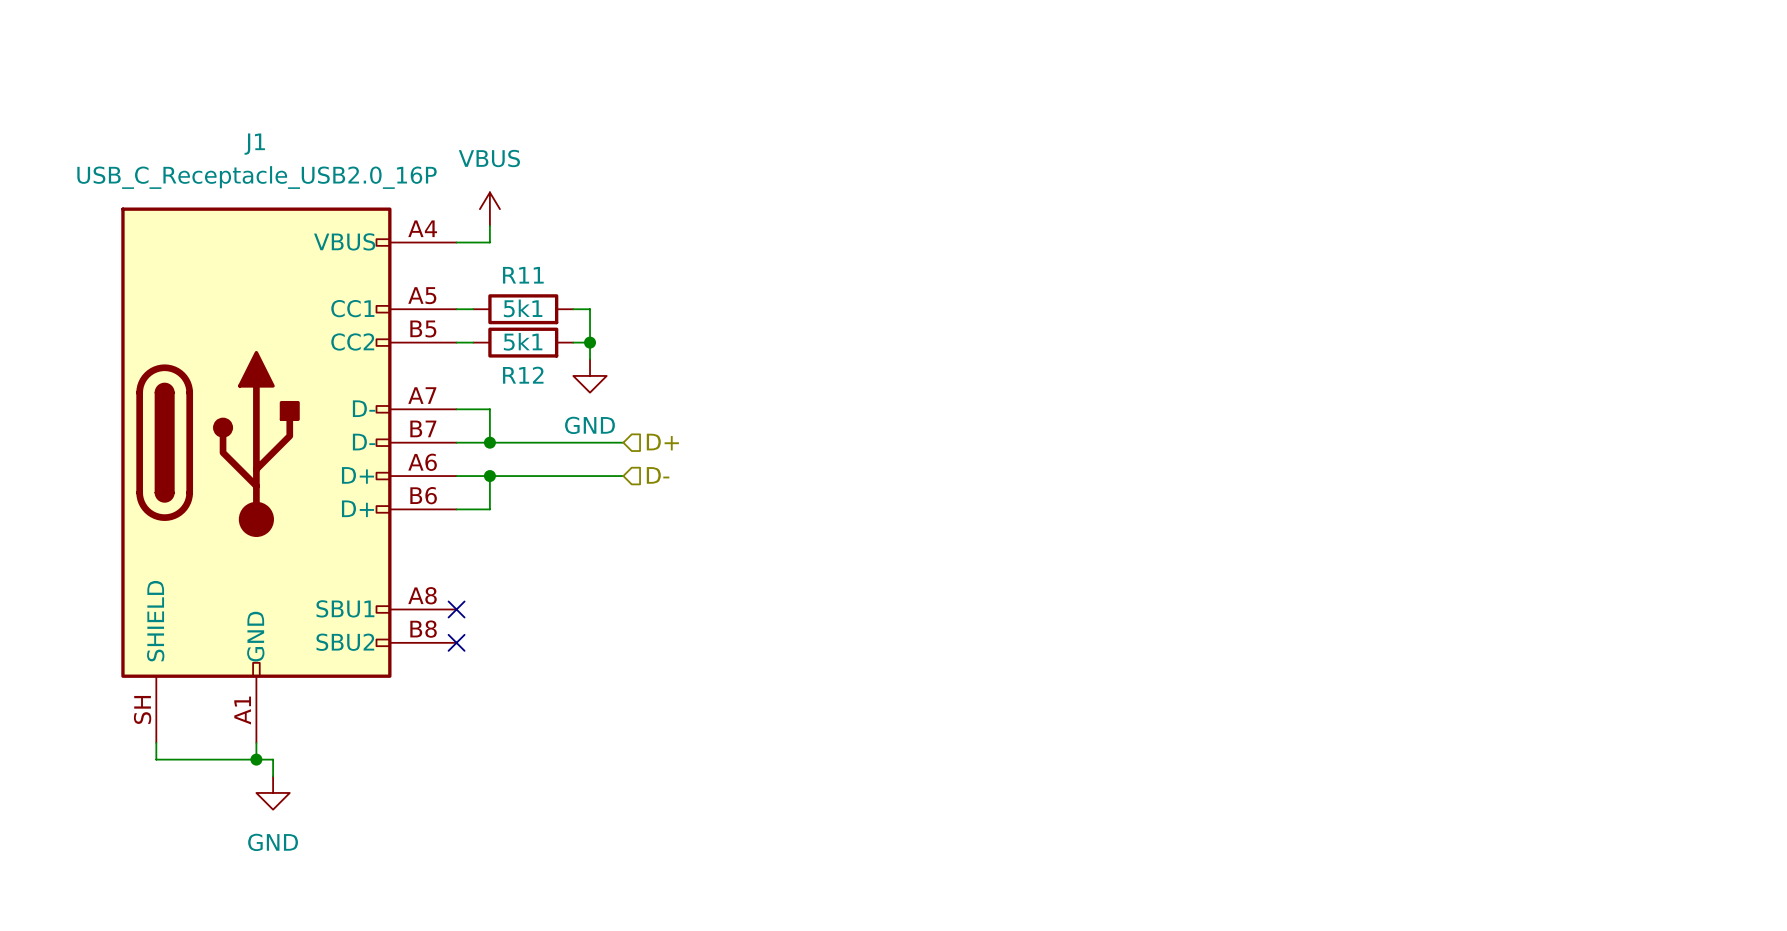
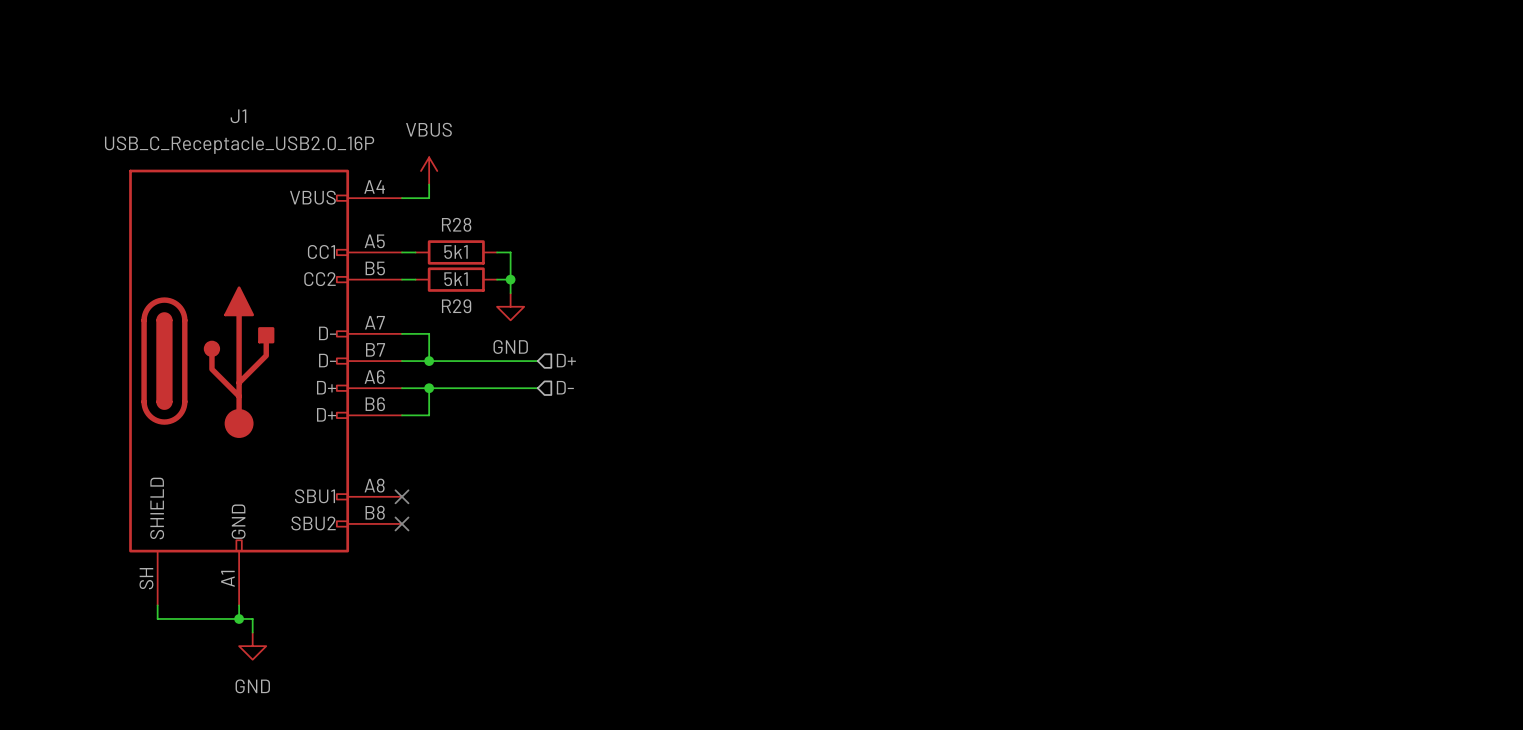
R11 name: R11 (523, 275) -> R28 (456, 224)
R12 name: R12 (523, 375) -> R29 (456, 306)

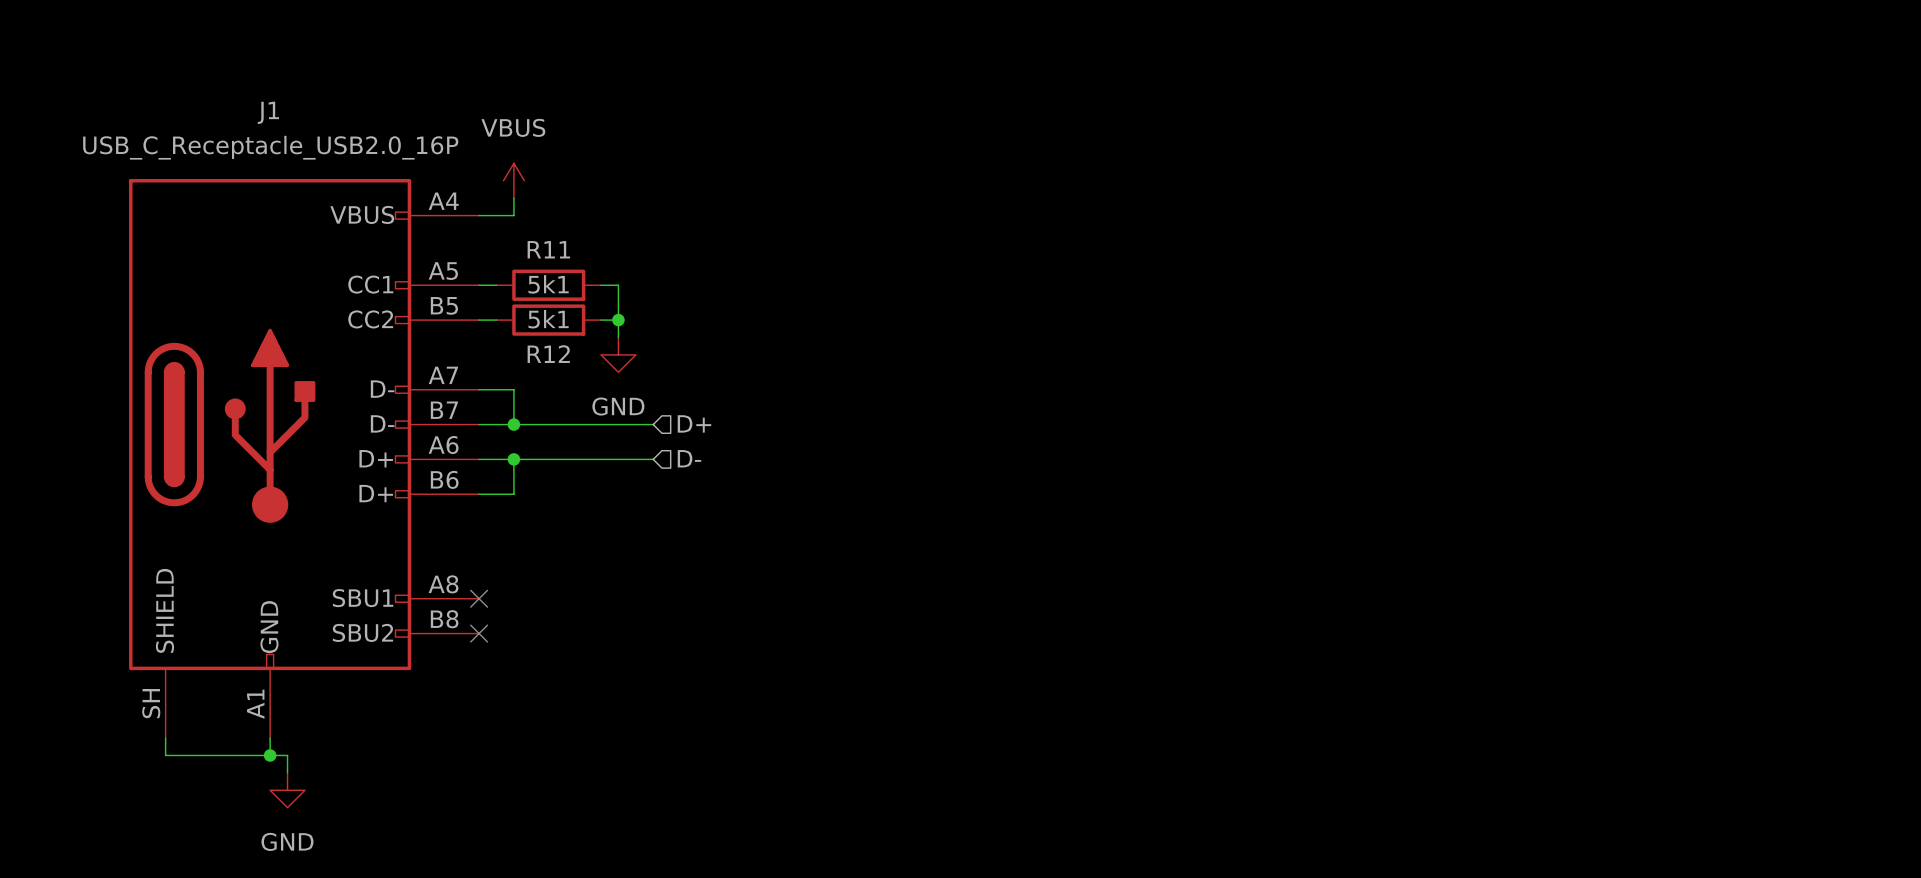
R28 name: R28 (456, 224) -> R11 (548, 249)
R29 name: R29 (456, 306) -> R12 (548, 354)

